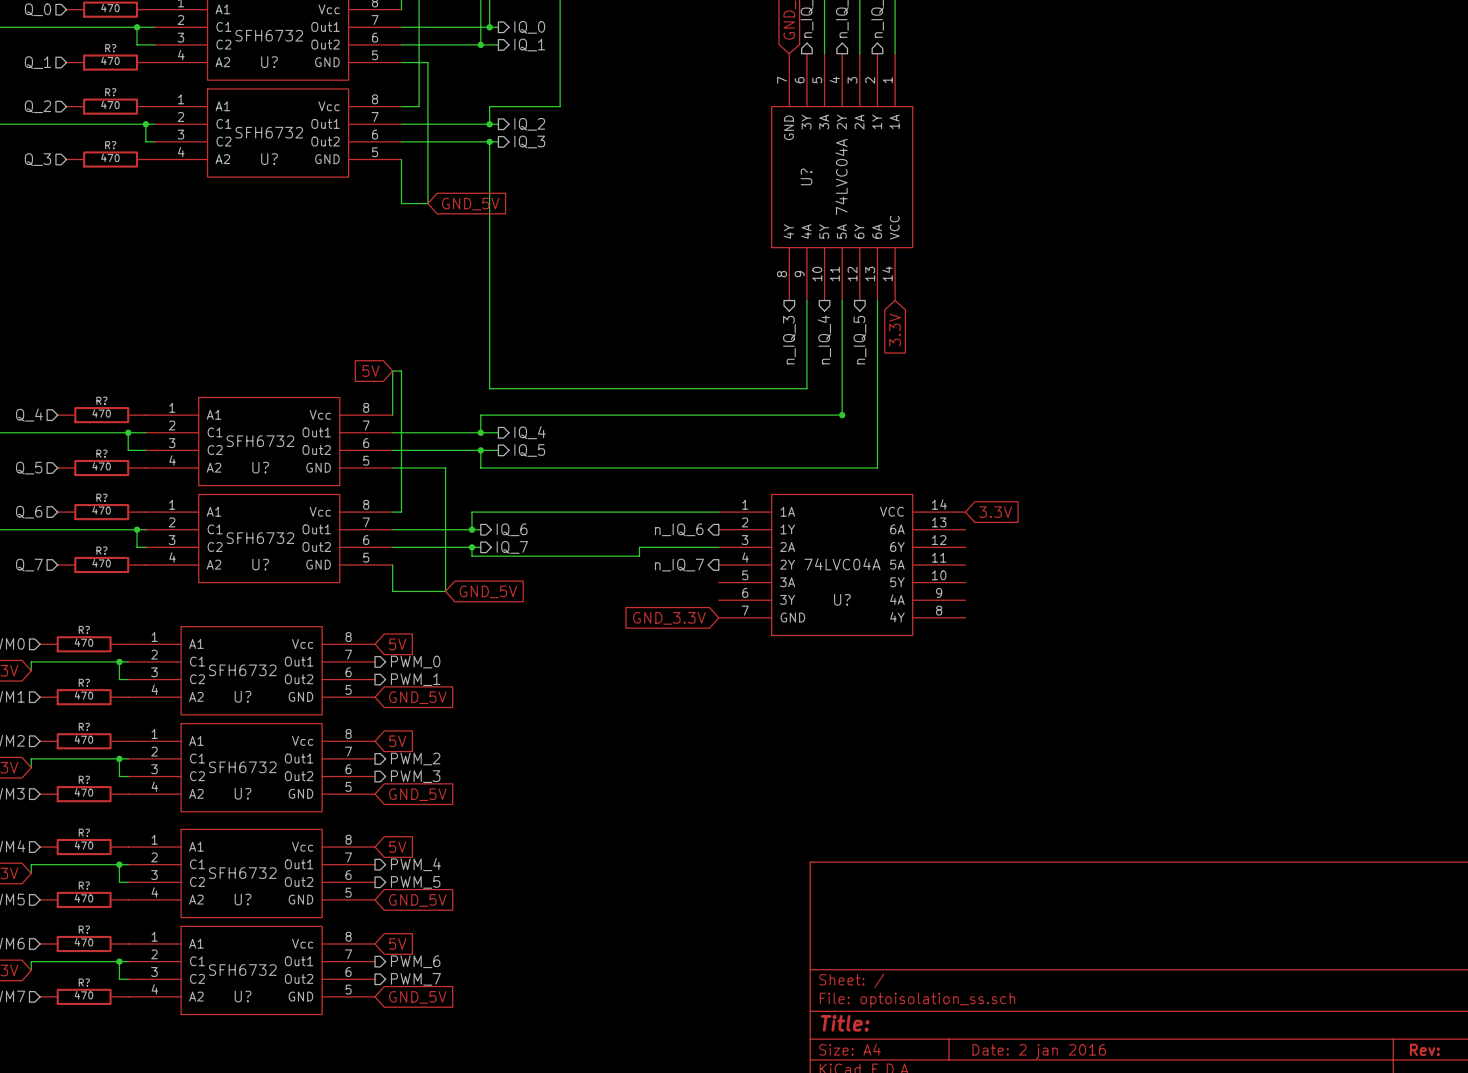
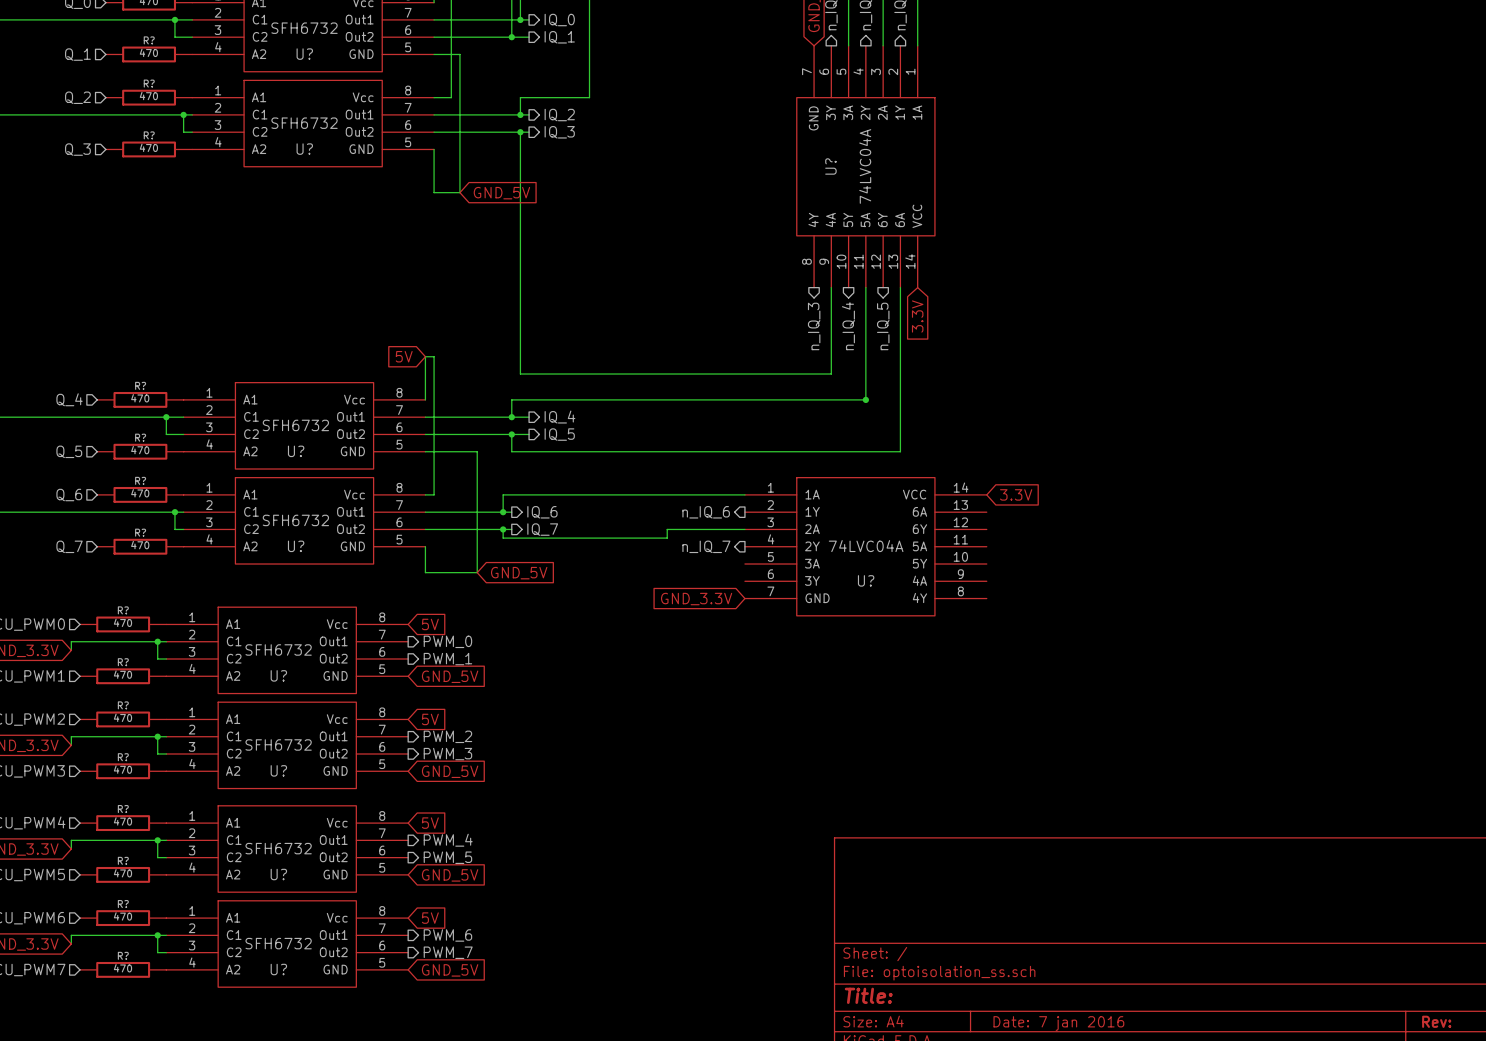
title block: Date: 2 jan 2016 (1039, 1051) -> Date: 7 jan 2016 (1058, 1023)

